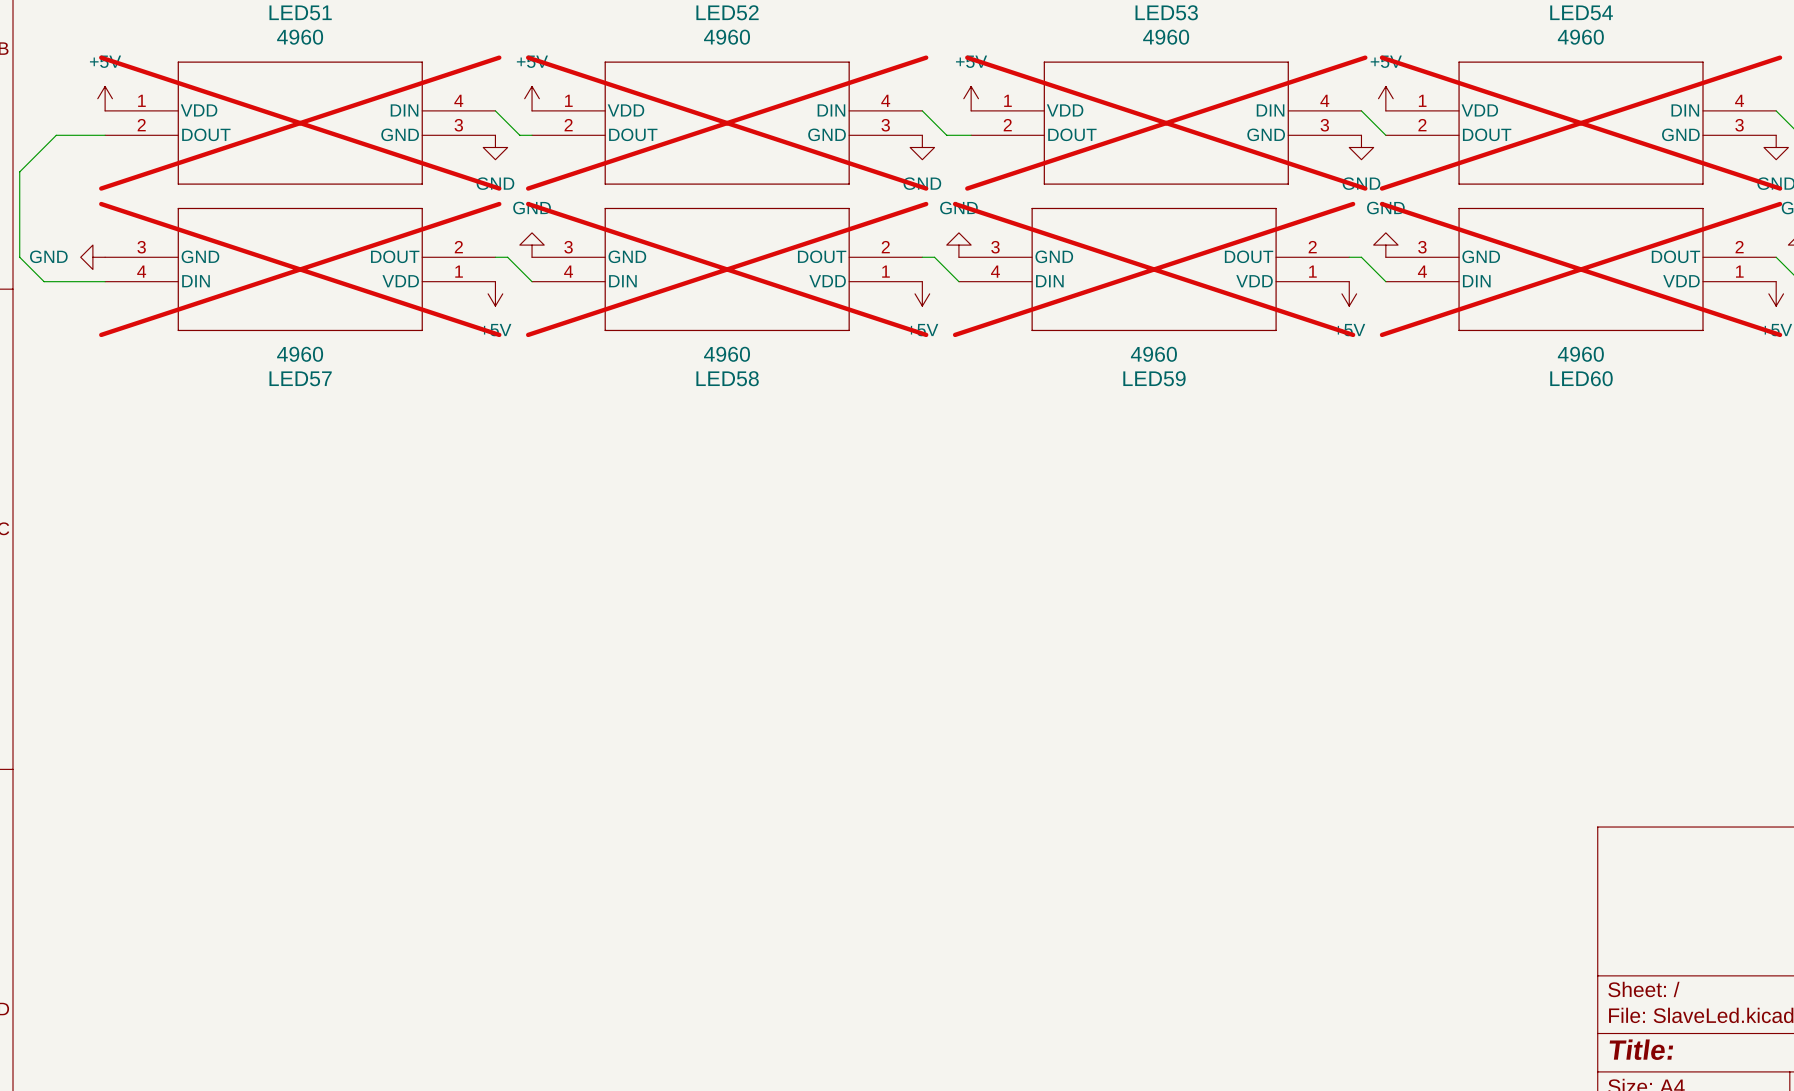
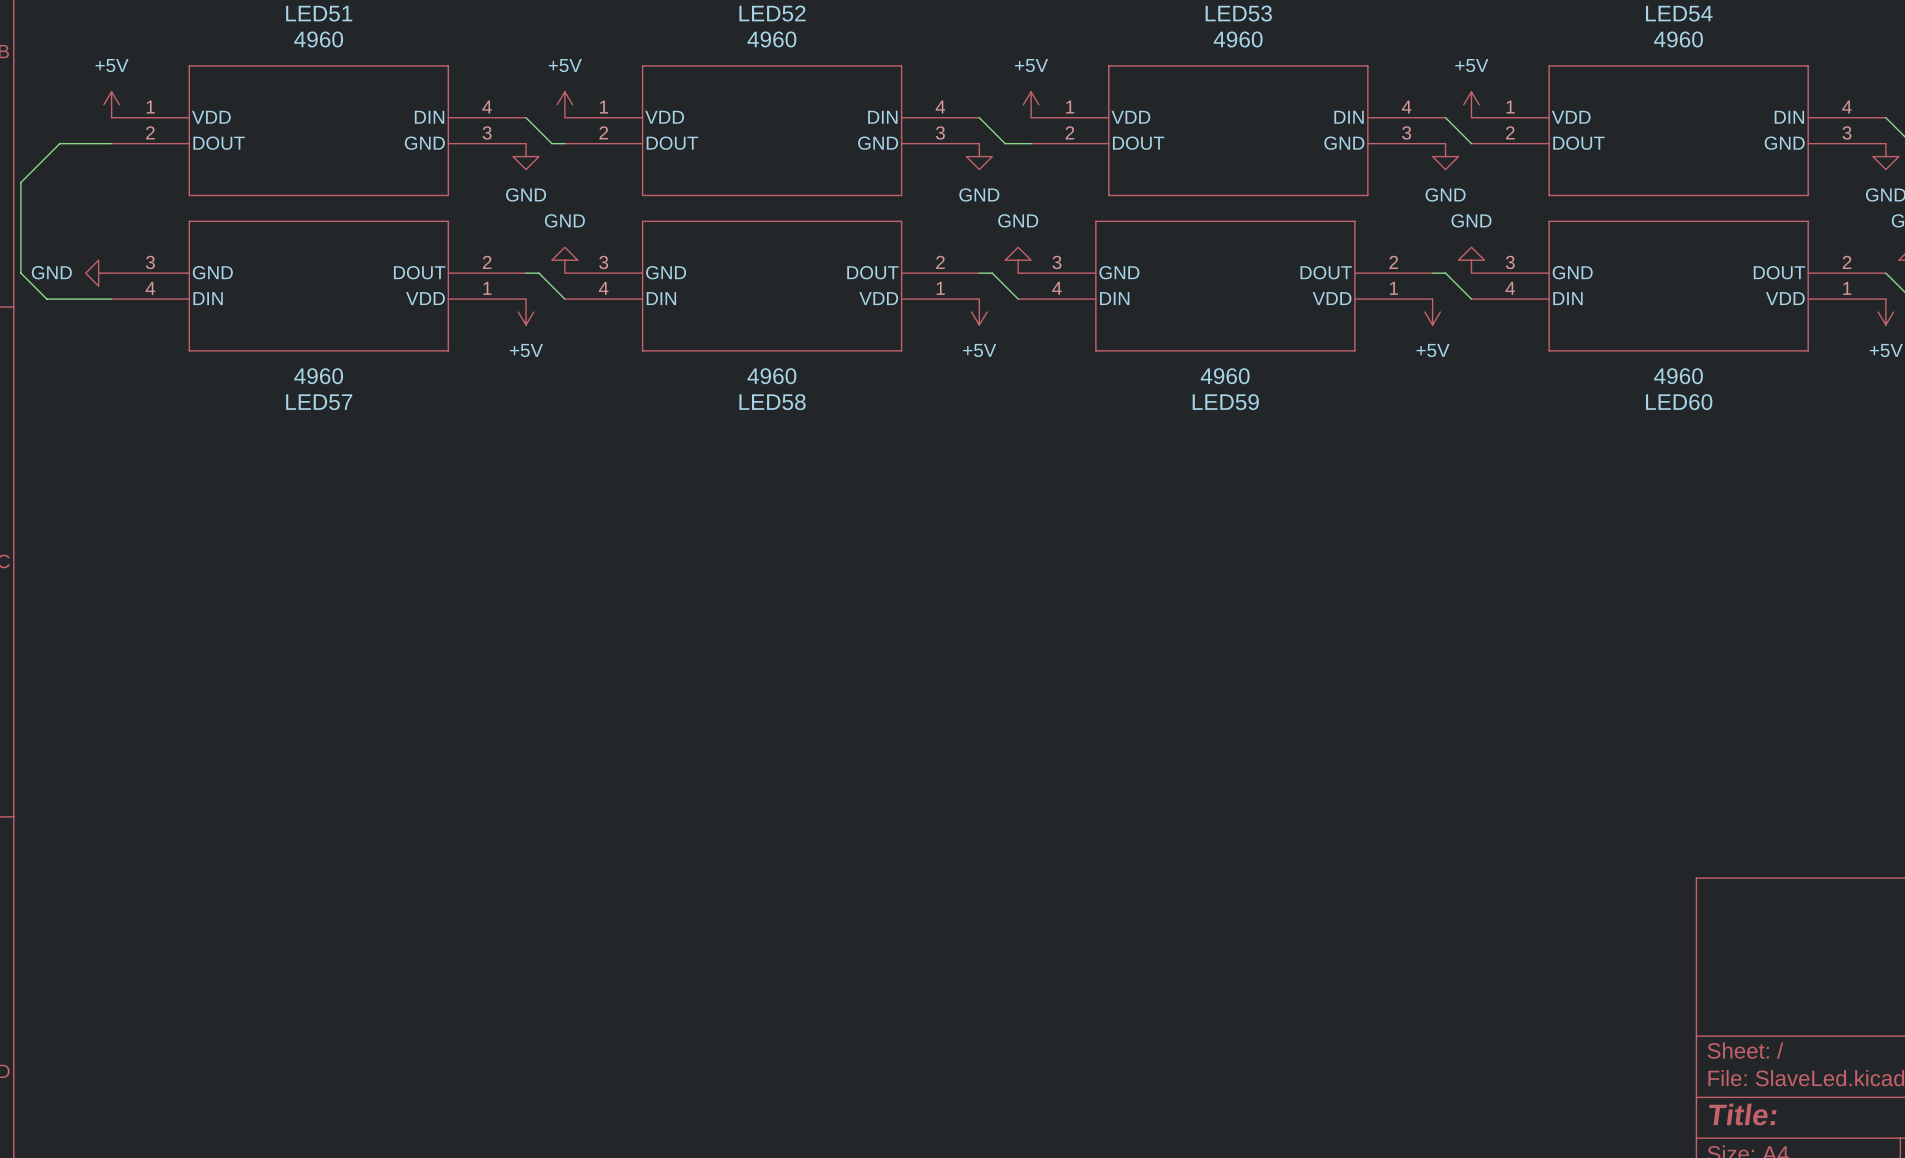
LED51 do-not-place cross: (300, 123) -> none
LED52 do-not-place cross: (727, 123) -> none
LED53 do-not-place cross: (1166, 123) -> none
LED54 do-not-place cross: (1581, 123) -> none
LED57 do-not-place cross: (300, 269) -> none
LED58 do-not-place cross: (727, 269) -> none
LED59 do-not-place cross: (1154, 269) -> none
LED60 do-not-place cross: (1581, 269) -> none

